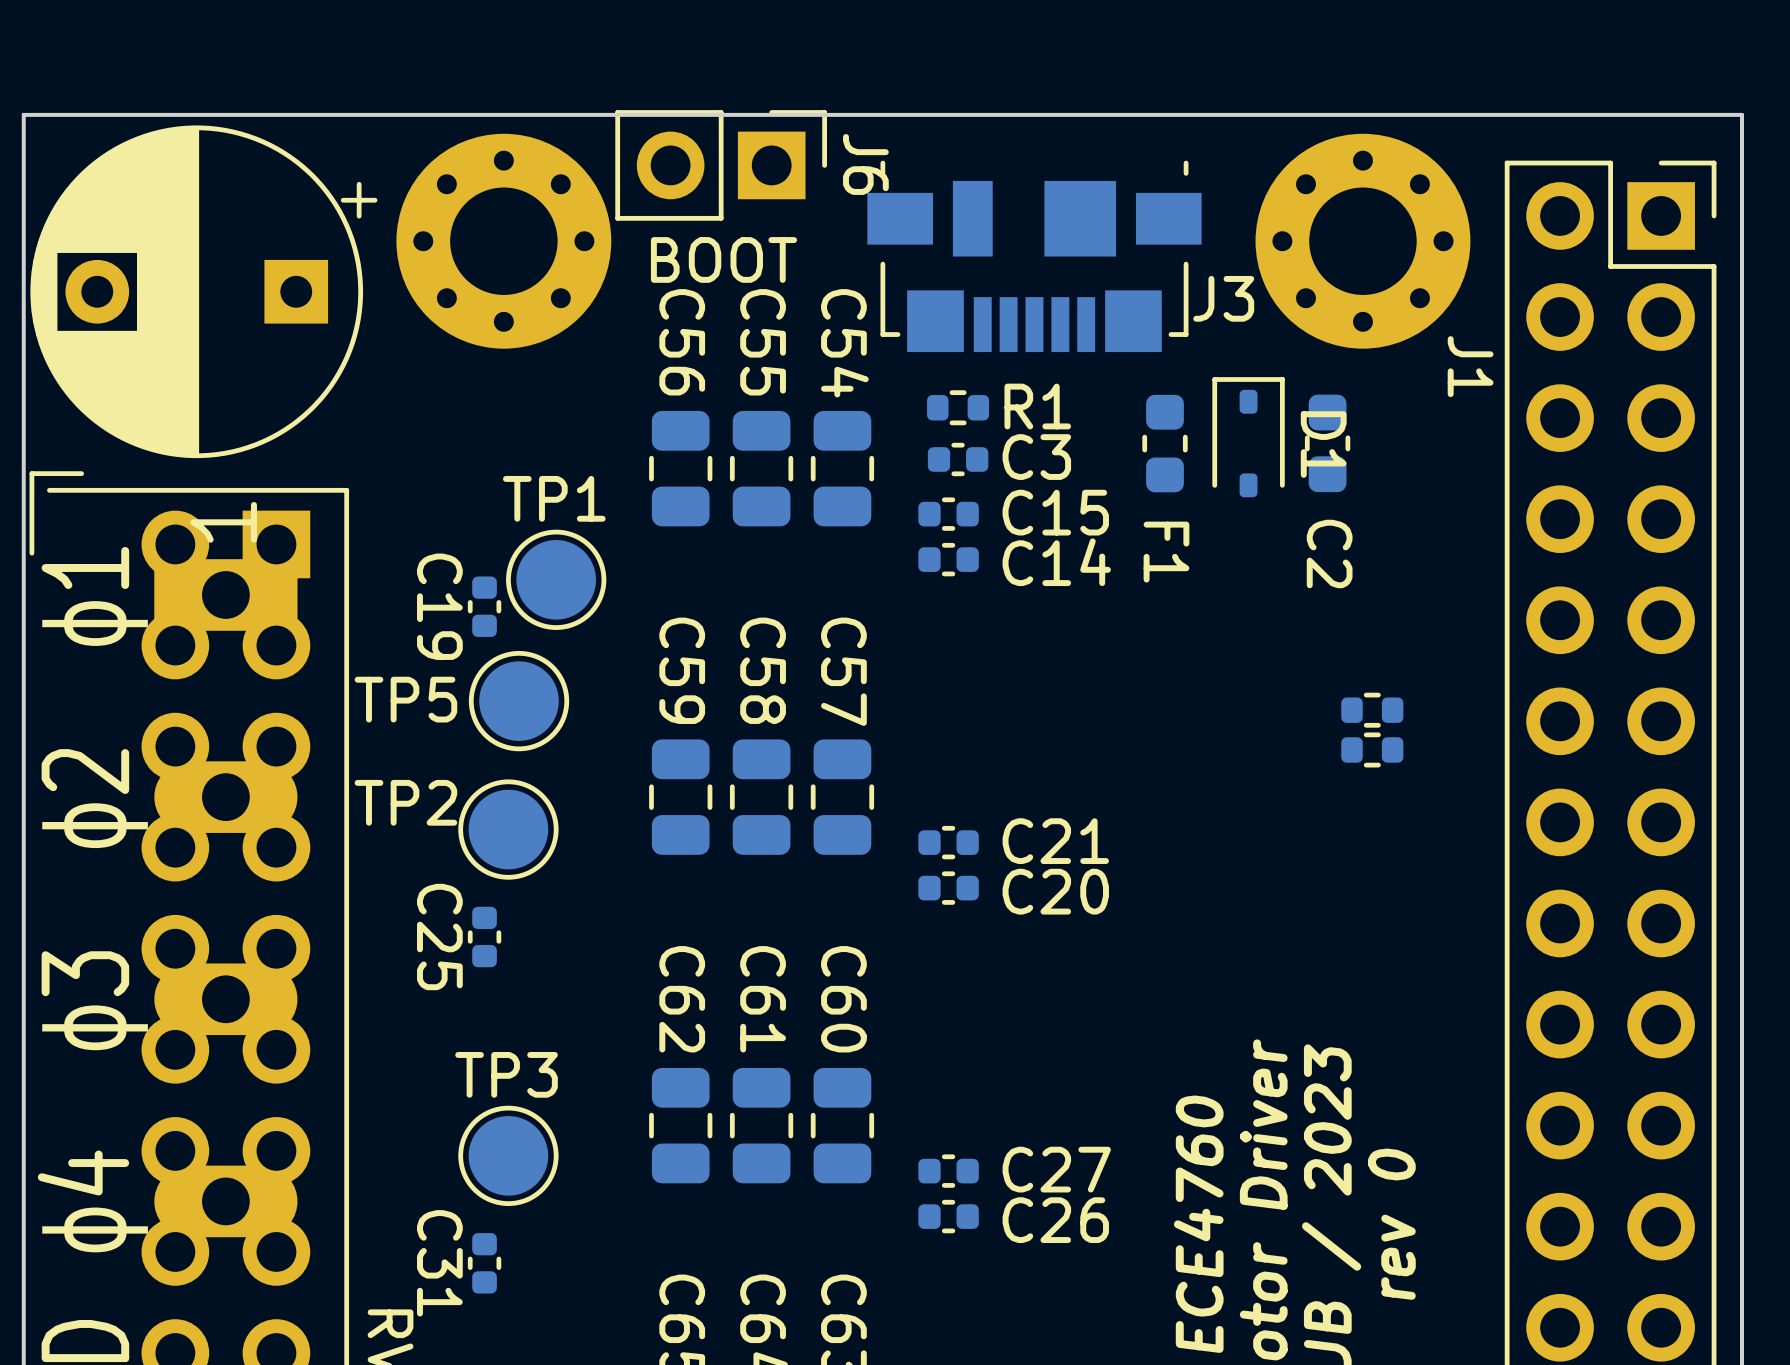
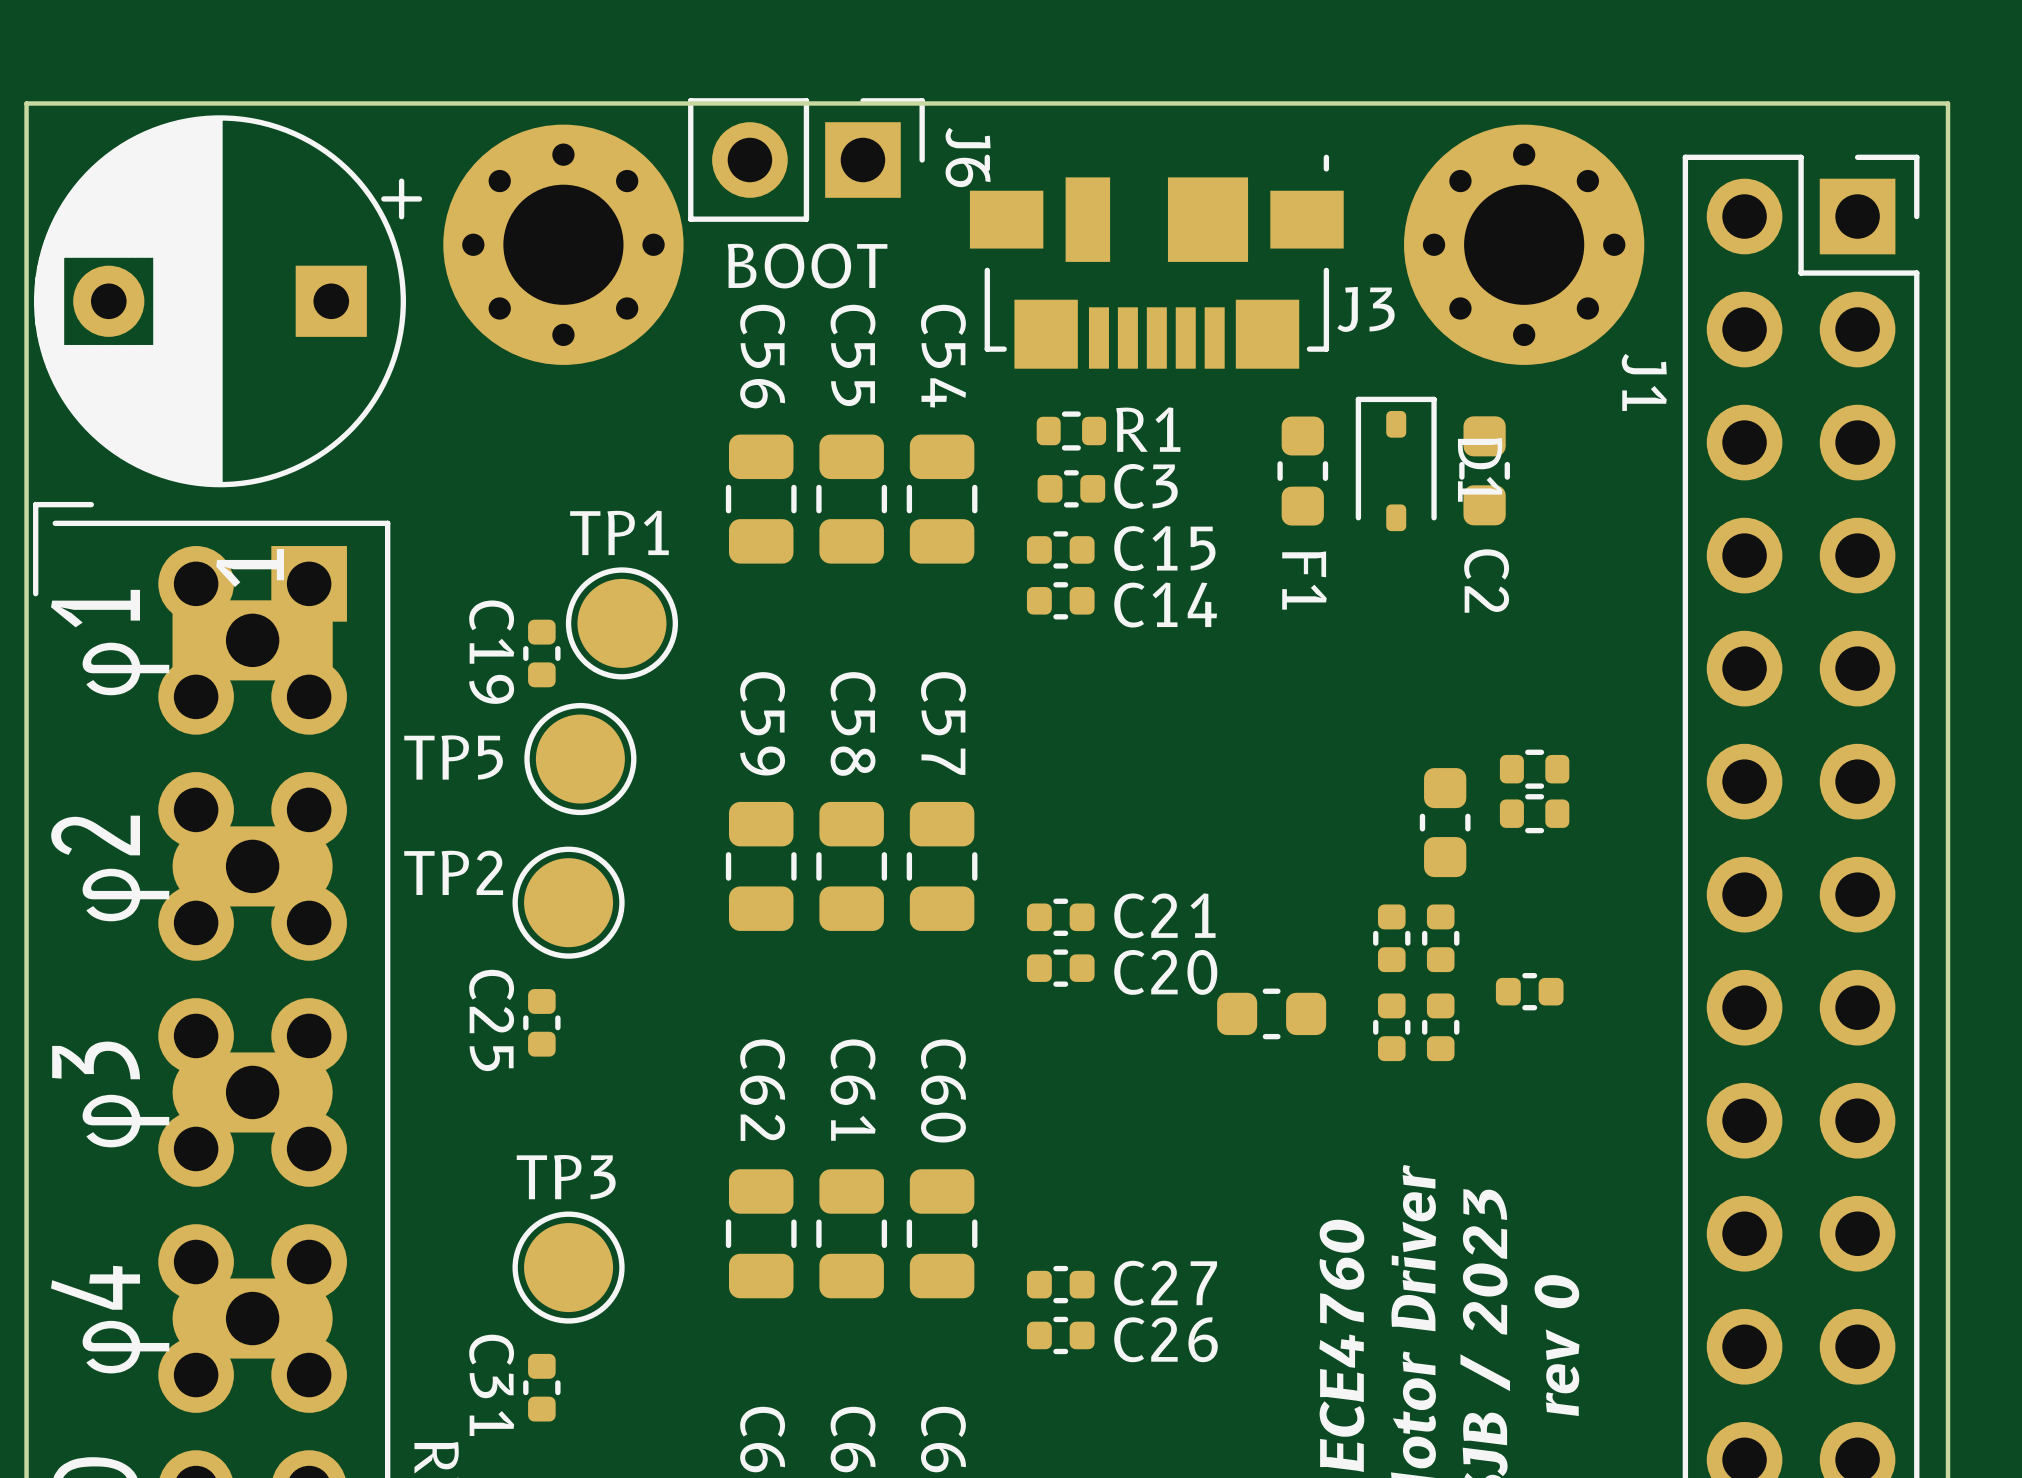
part: none -> (1445, 822)
part: none -> (1391, 938)
part: none -> (1440, 938)
part: none -> (1529, 991)
part: none -> (1271, 1013)
part: none -> (1391, 1027)
part: none -> (1440, 1027)

